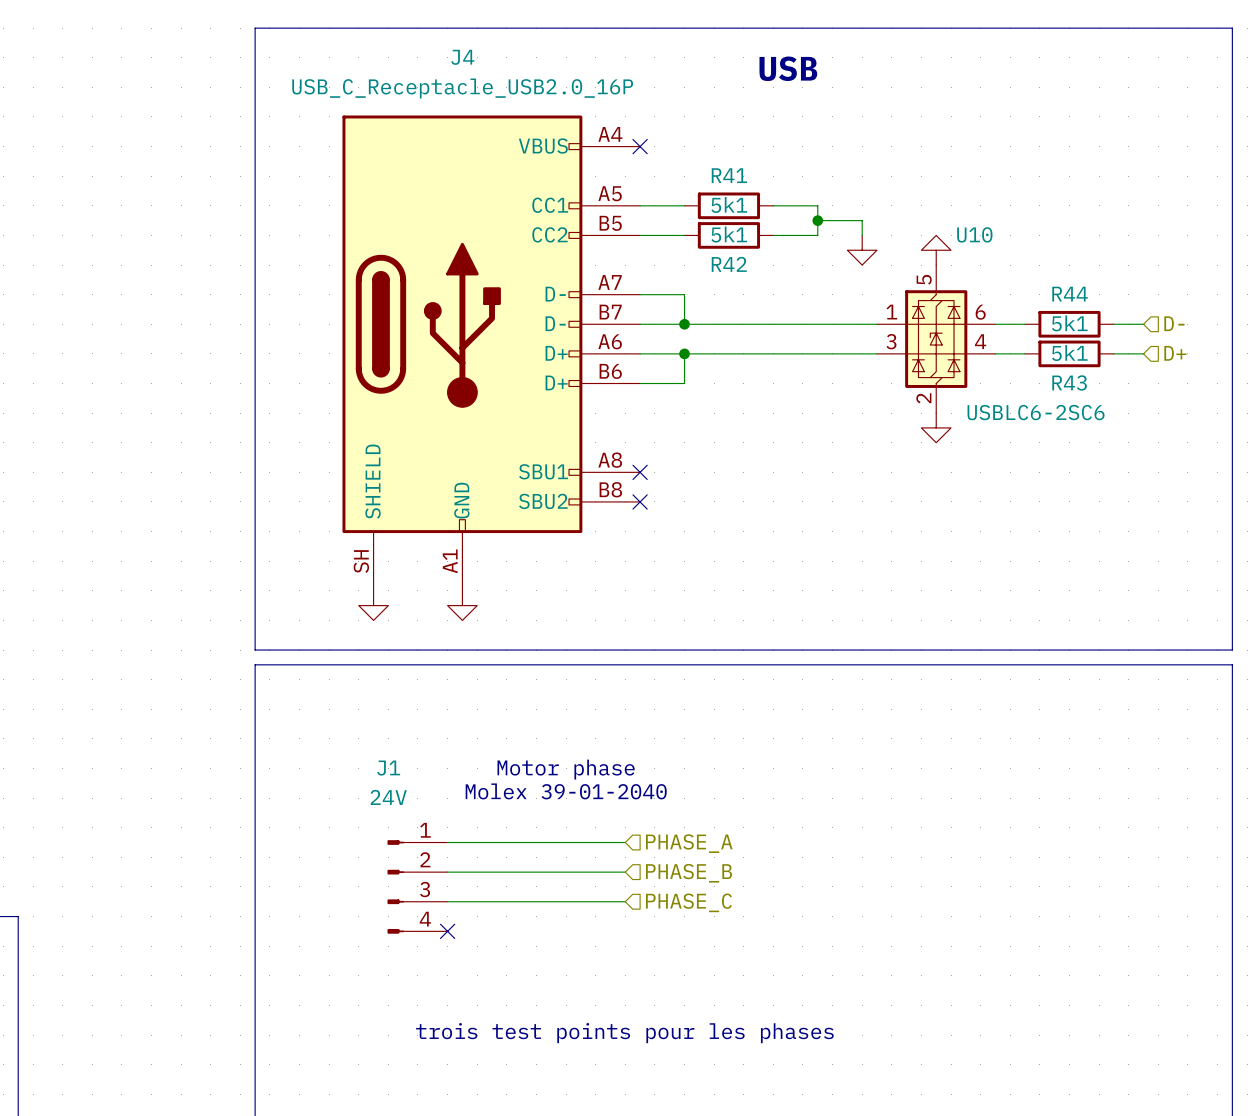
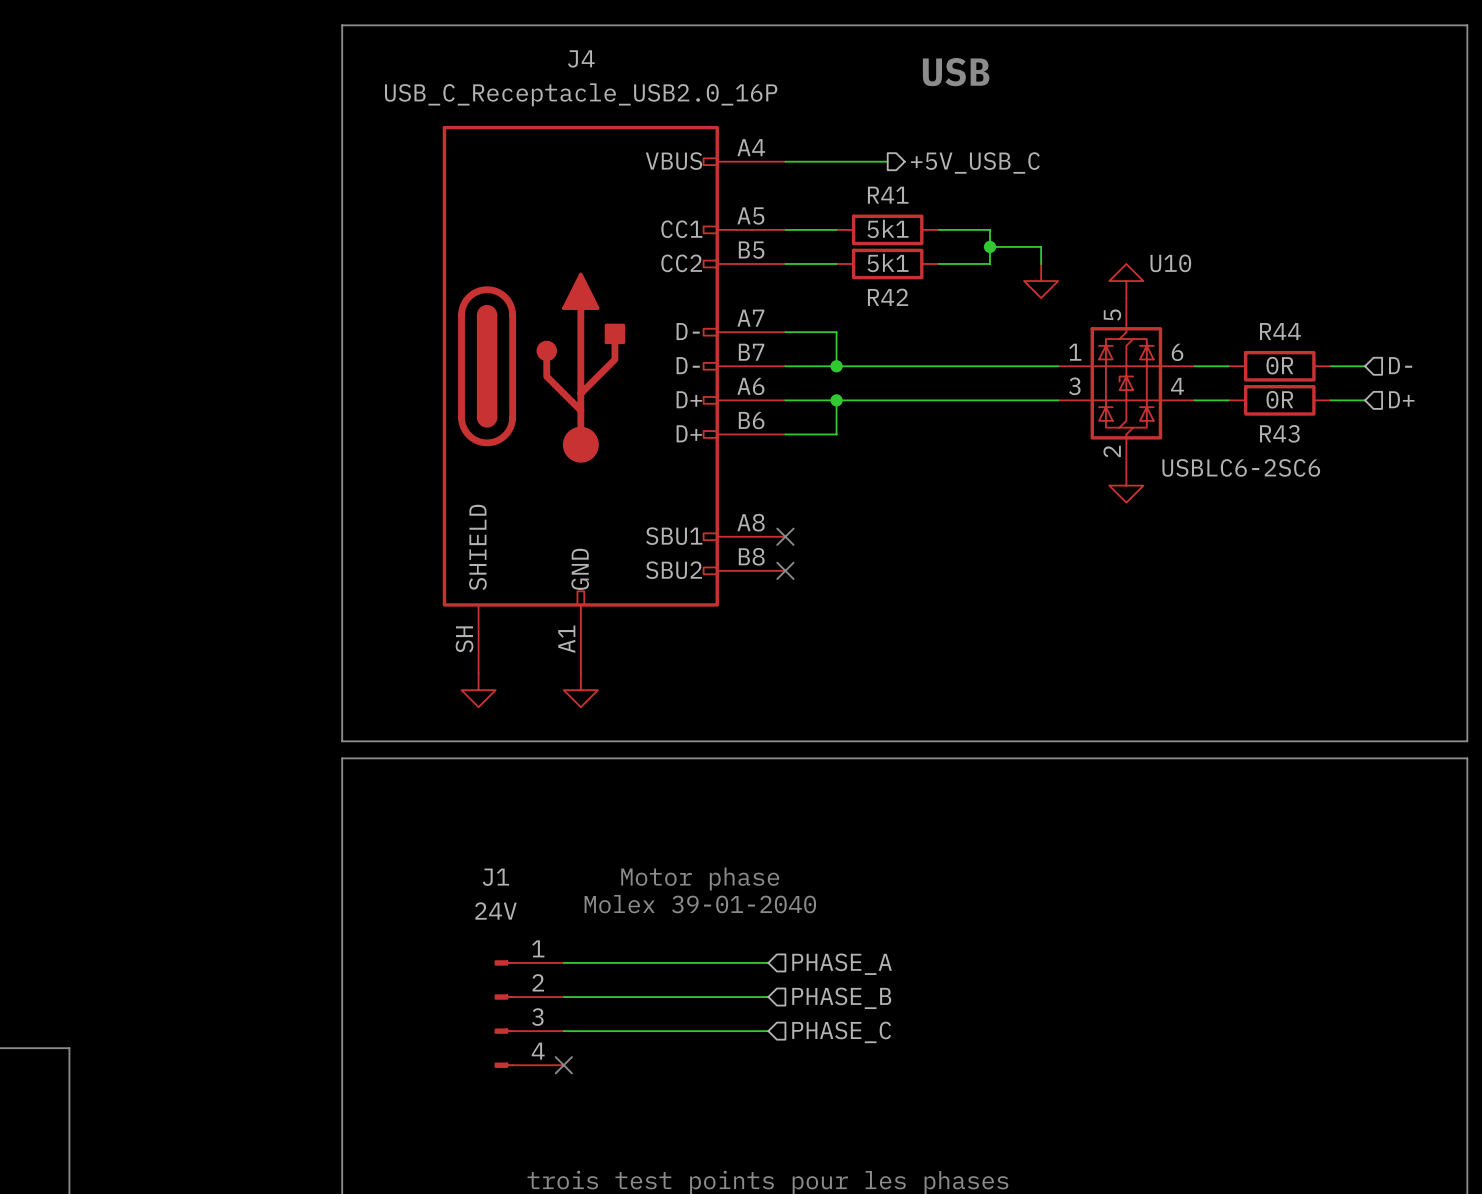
wire: none -> (785, 161) (887, 161)
no-connect mark: (640, 146) -> none
hierarchical label: none -> +5V_USB_C (975, 162)
R44 value: 5k1 (1069, 323) -> 0R (1279, 365)
R43 value: 5k1 (1069, 353) -> 0R (1279, 399)

